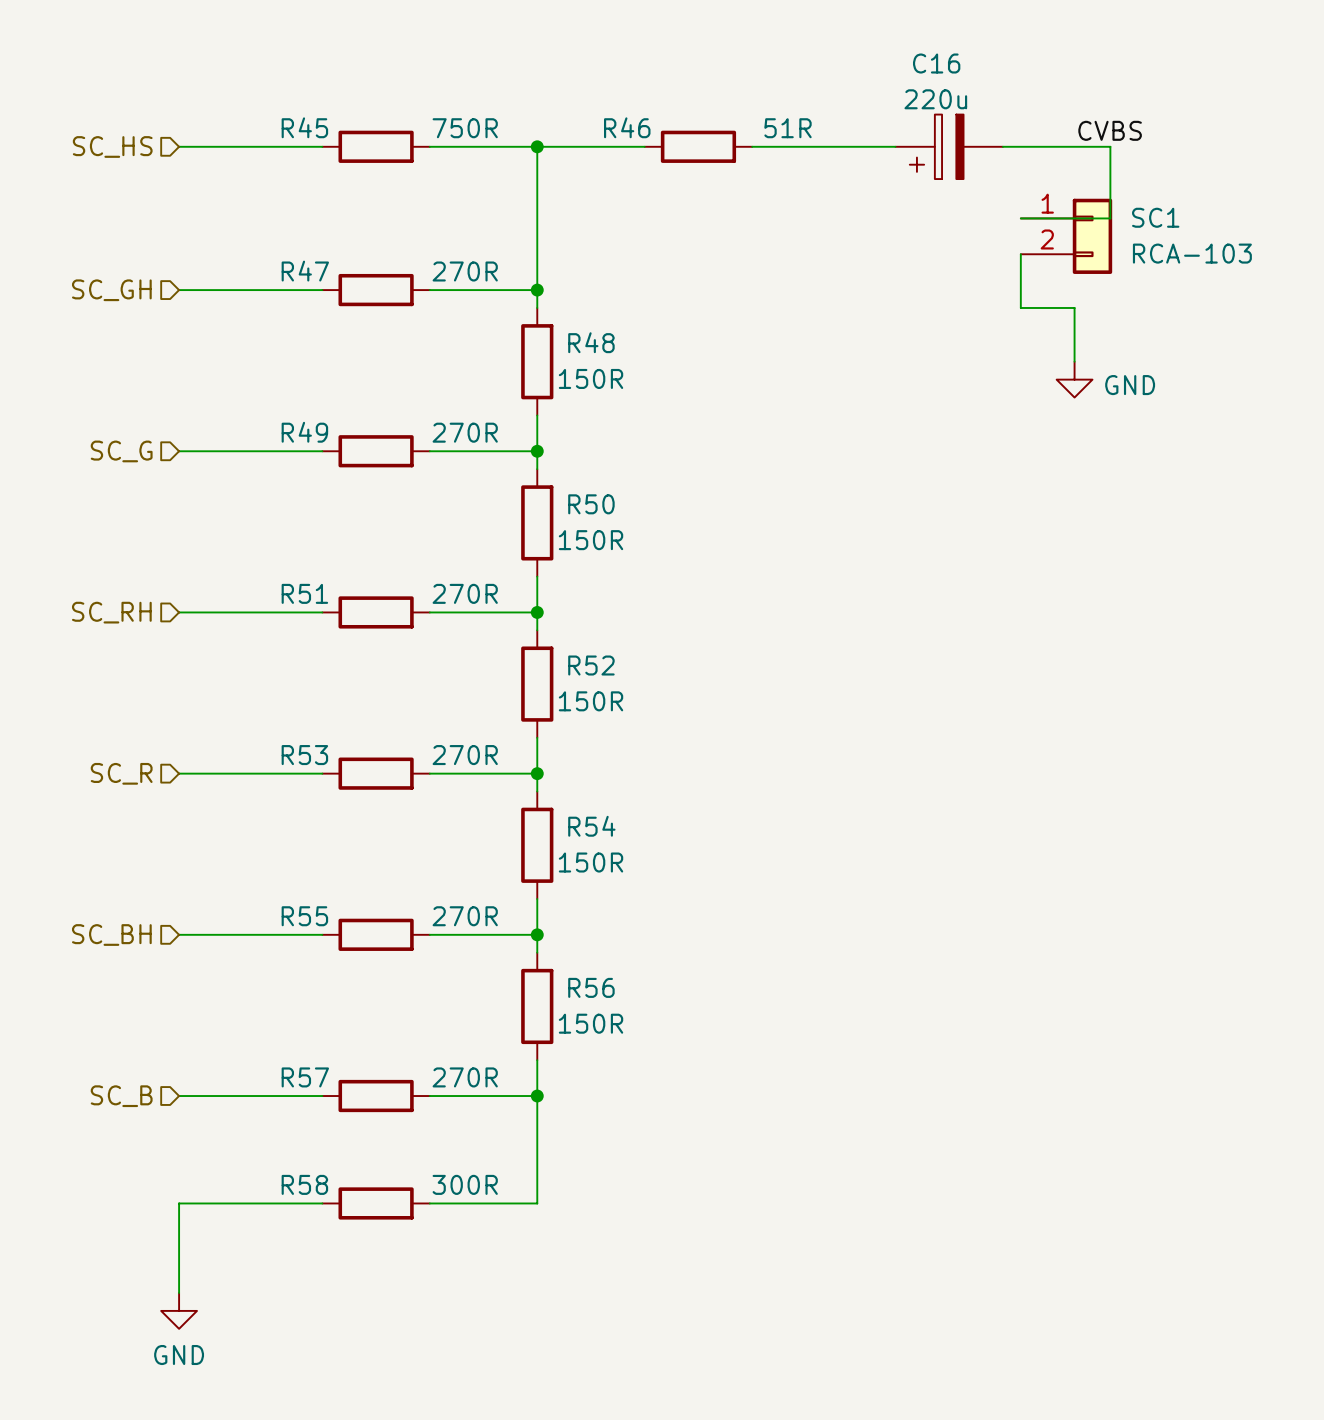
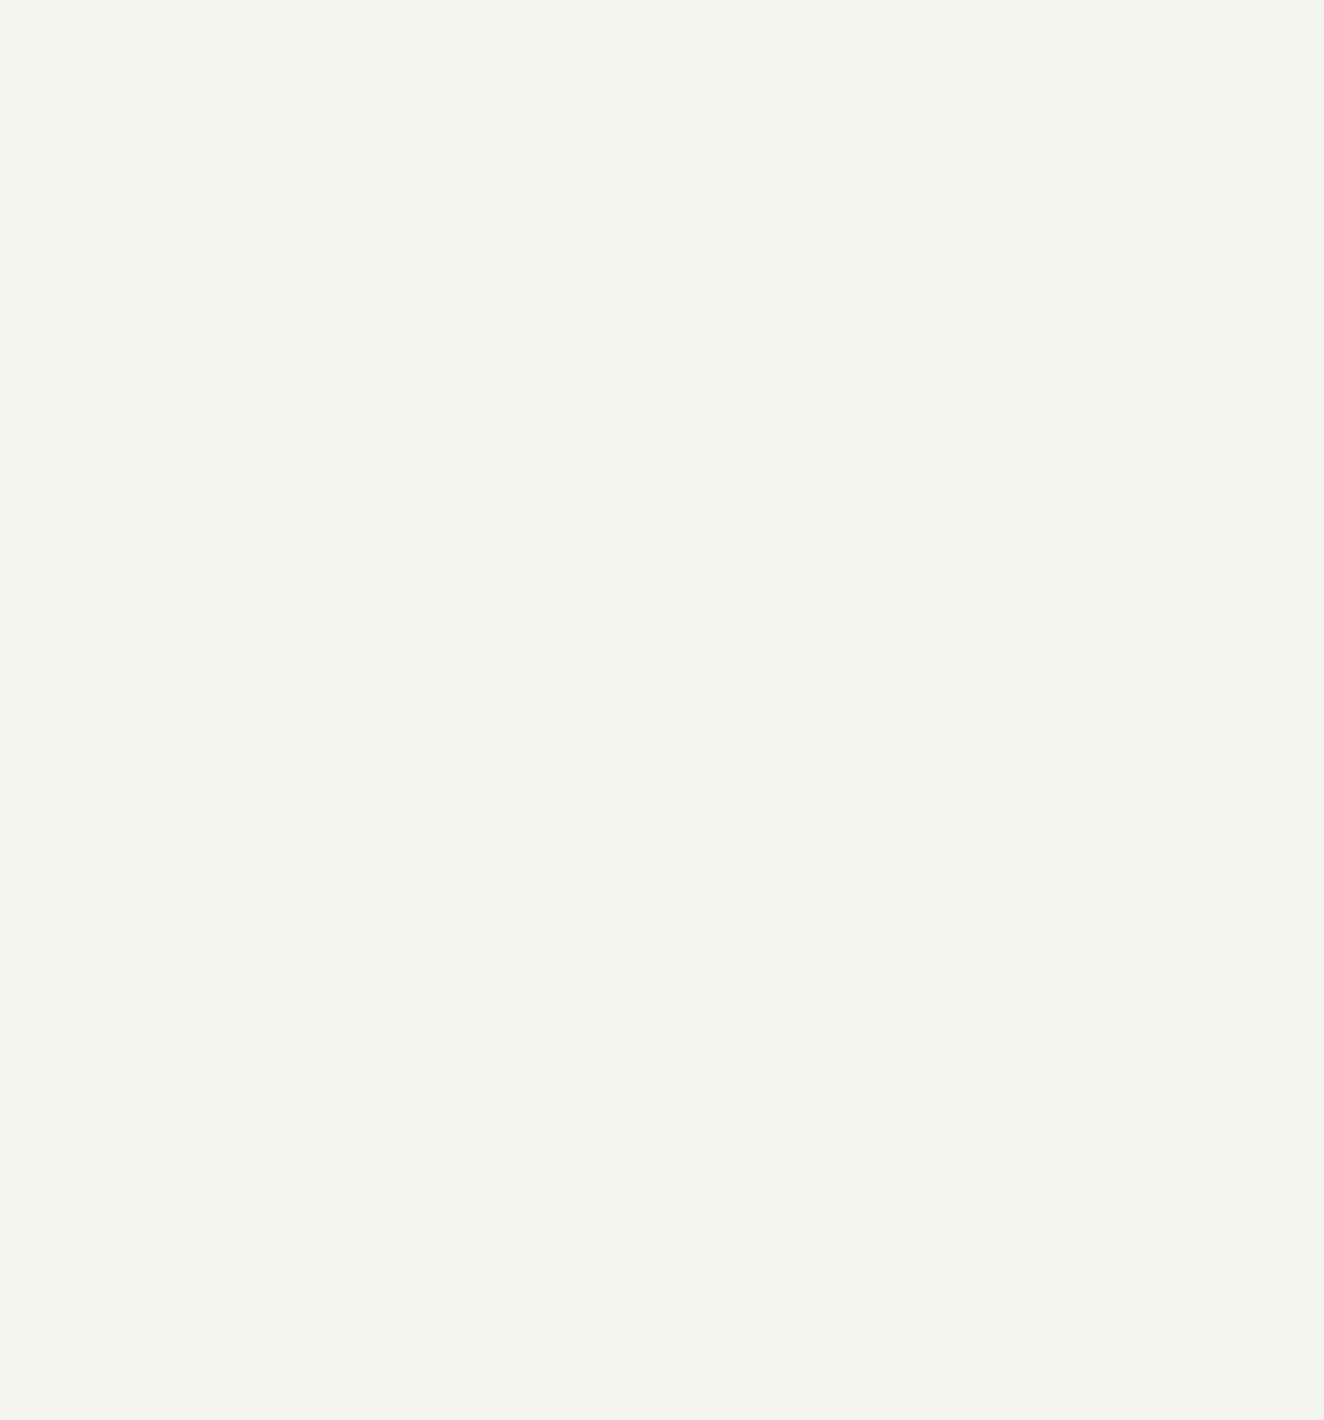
label: CVBS (1110, 130) -> none
hierarchical label: SC_HS (112, 146) -> none
wire: (179, 146) (322, 146) -> none
R45: 750R (376, 146) -> none
wire: (429, 146) (644, 146) -> none
wire: (537, 146) (537, 307) -> none
junction: (537, 146) -> none
R46: 51R (698, 146) -> none
wire: (752, 146) (895, 146) -> none
C16: 220u (949, 146) -> none
wire: (1002, 146) (1110, 146) (1110, 218) (1020, 218) -> none
SC1: RCA-103 (1066, 236) -> none
wire: (1020, 254) (1020, 307) (1074, 307) (1074, 361) -> none
hierarchical label: SC_GH (111, 290) -> none
wire: (179, 290) (322, 290) -> none
R47: 270R (376, 290) -> none
wire: (429, 290) (537, 290) -> none
junction: (537, 290) -> none
R48: 150R (537, 361) -> none
power symbol: GND (1074, 379) -> none
wire: (537, 415) (537, 469) -> none
hierarchical label: SC_G (121, 451) -> none
wire: (179, 451) (322, 451) -> none
R49: 270R (376, 451) -> none
wire: (429, 451) (537, 451) -> none
junction: (537, 451) -> none
R50: 150R (537, 522) -> none
wire: (537, 576) (537, 630) -> none
hierarchical label: SC_RH (111, 612) -> none
wire: (179, 612) (322, 612) -> none
R51: 270R (376, 612) -> none
wire: (429, 612) (537, 612) -> none
junction: (537, 612) -> none
R52: 150R (537, 684) -> none
wire: (537, 737) (537, 791) -> none
hierarchical label: SC_R (121, 773) -> none
wire: (179, 773) (322, 773) -> none
R53: 270R (376, 773) -> none
wire: (429, 773) (537, 773) -> none
junction: (537, 773) -> none
R54: 150R (537, 845) -> none
wire: (537, 899) (537, 952) -> none
wire: (179, 934) (322, 934) -> none
R55: 270R (376, 934) -> none
wire: (429, 934) (537, 934) -> none
junction: (537, 934) -> none
hierarchical label: SC_BH (111, 935) -> none
R56: 150R (537, 1006) -> none
wire: (537, 1060) (537, 1203) (429, 1203) -> none
hierarchical label: SC_B (121, 1096) -> none
wire: (179, 1096) (322, 1096) -> none
R57: 270R (376, 1096) -> none
wire: (429, 1096) (537, 1096) -> none
junction: (537, 1096) -> none
wire: (322, 1203) (179, 1203) (179, 1293) -> none
R58: 300R (376, 1203) -> none
power symbol: GND (179, 1310) -> none

